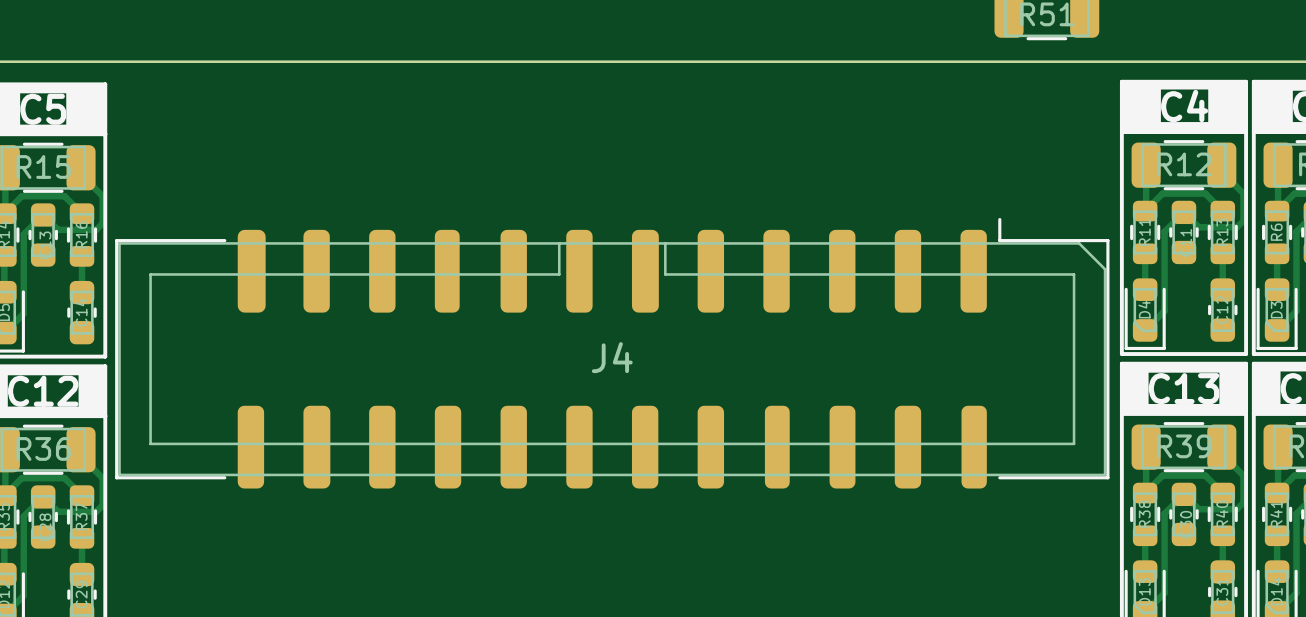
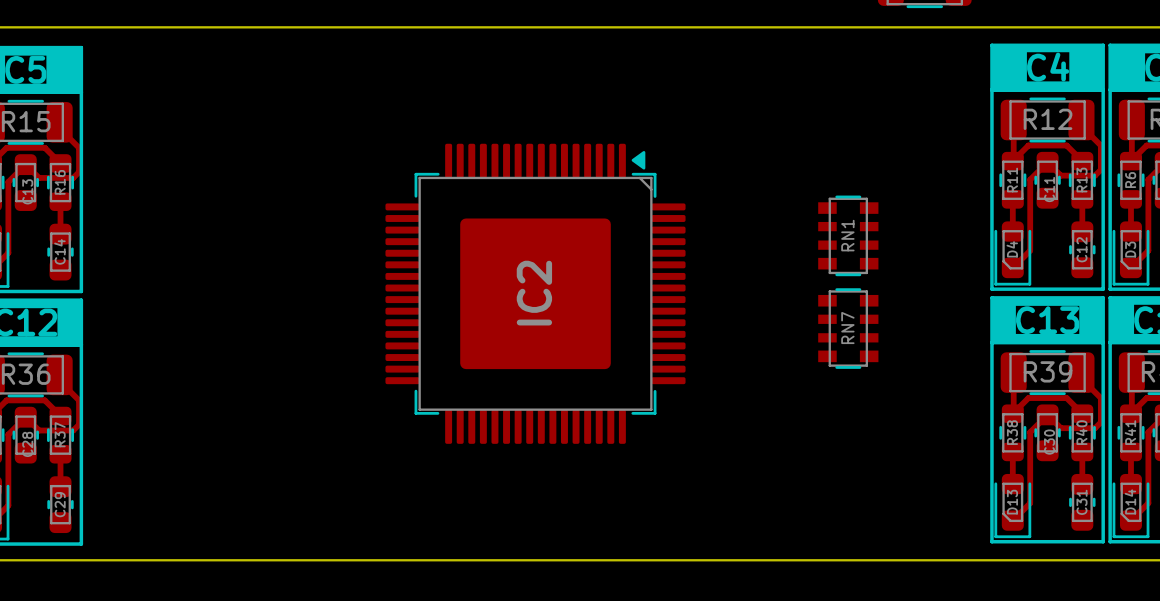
RN1: none -> (848, 235)
J4: (612, 353) -> none
IC2: none -> (535, 293)
RN7: none -> (848, 328)

